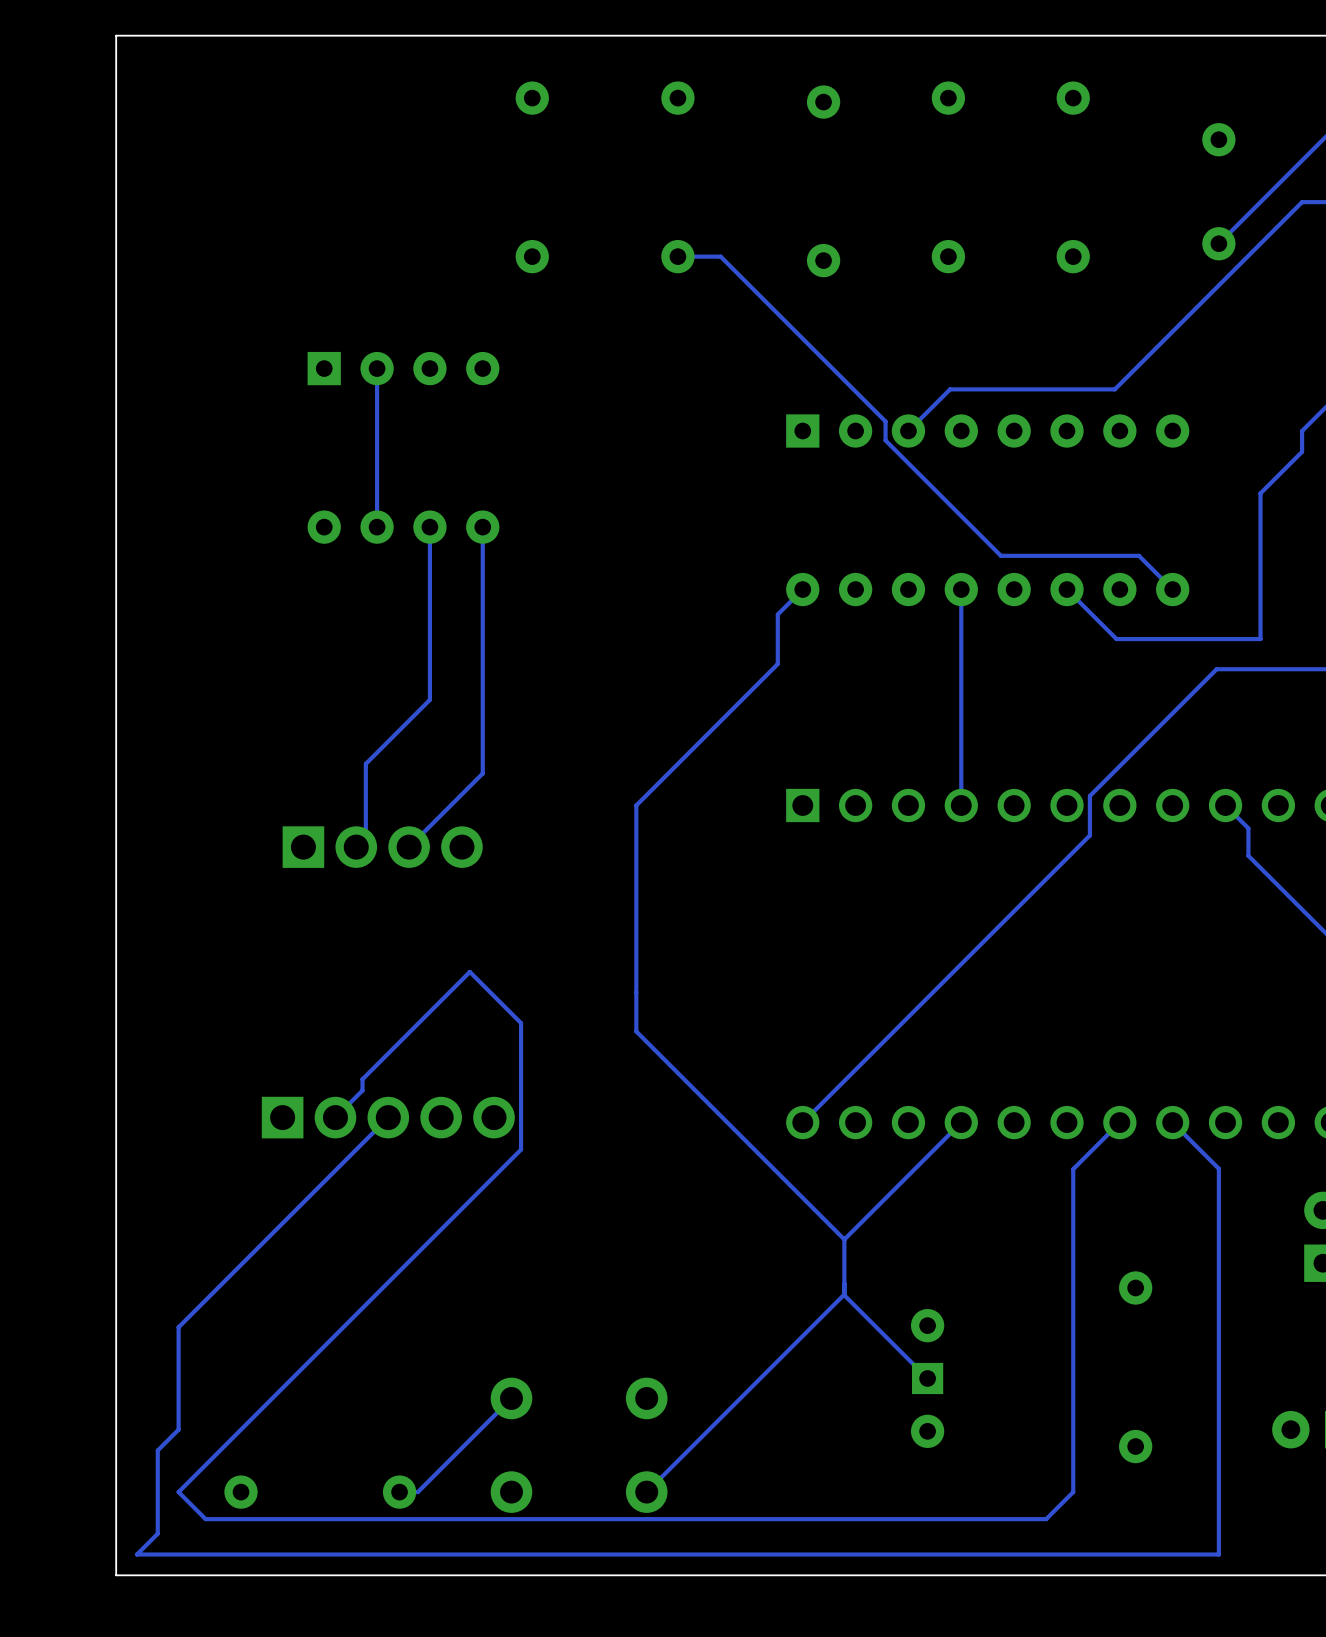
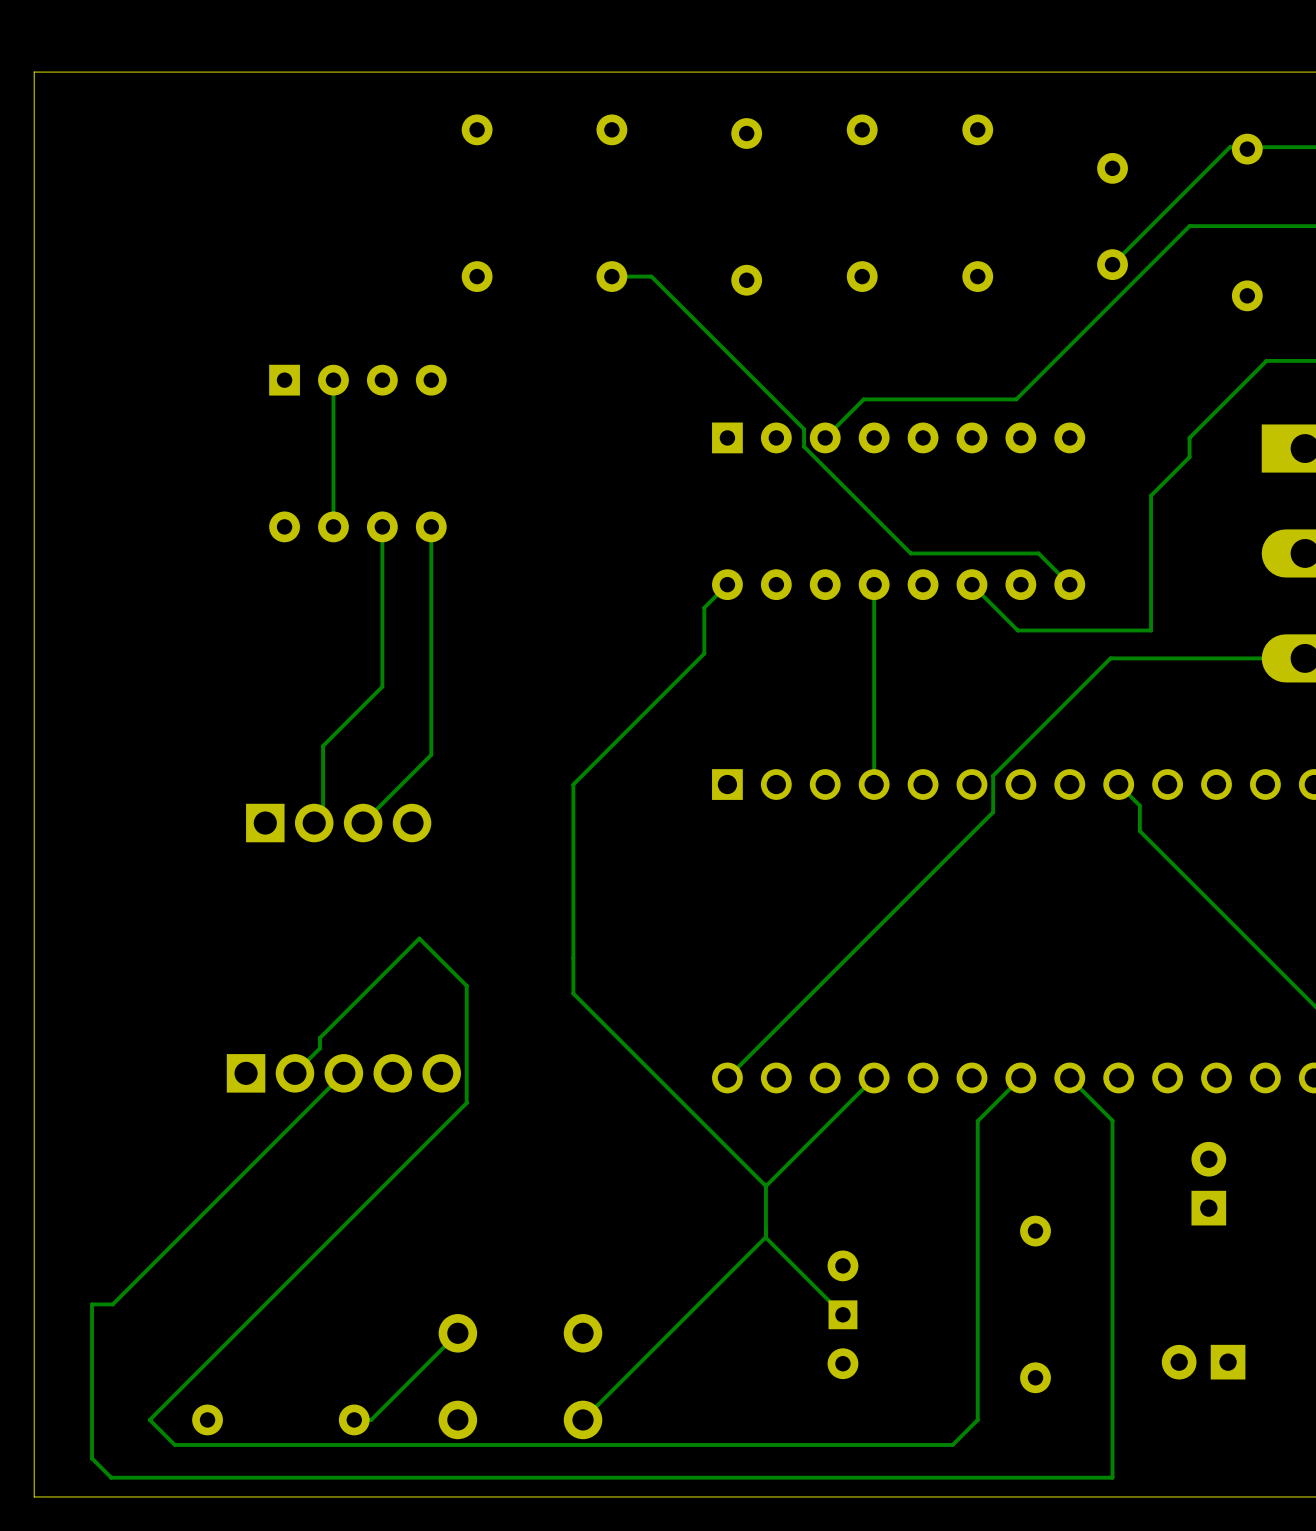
board edge: (116, 35) (116, 1575) -> (92, 72) (34, 72) (34, 1496) (92, 1496)
track: (178, 1327) (178, 1429) (157, 1450) (157, 1533) (136, 1554) -> (149, 1267) (112, 1304) (92, 1304) (92, 1458) (111, 1477)

